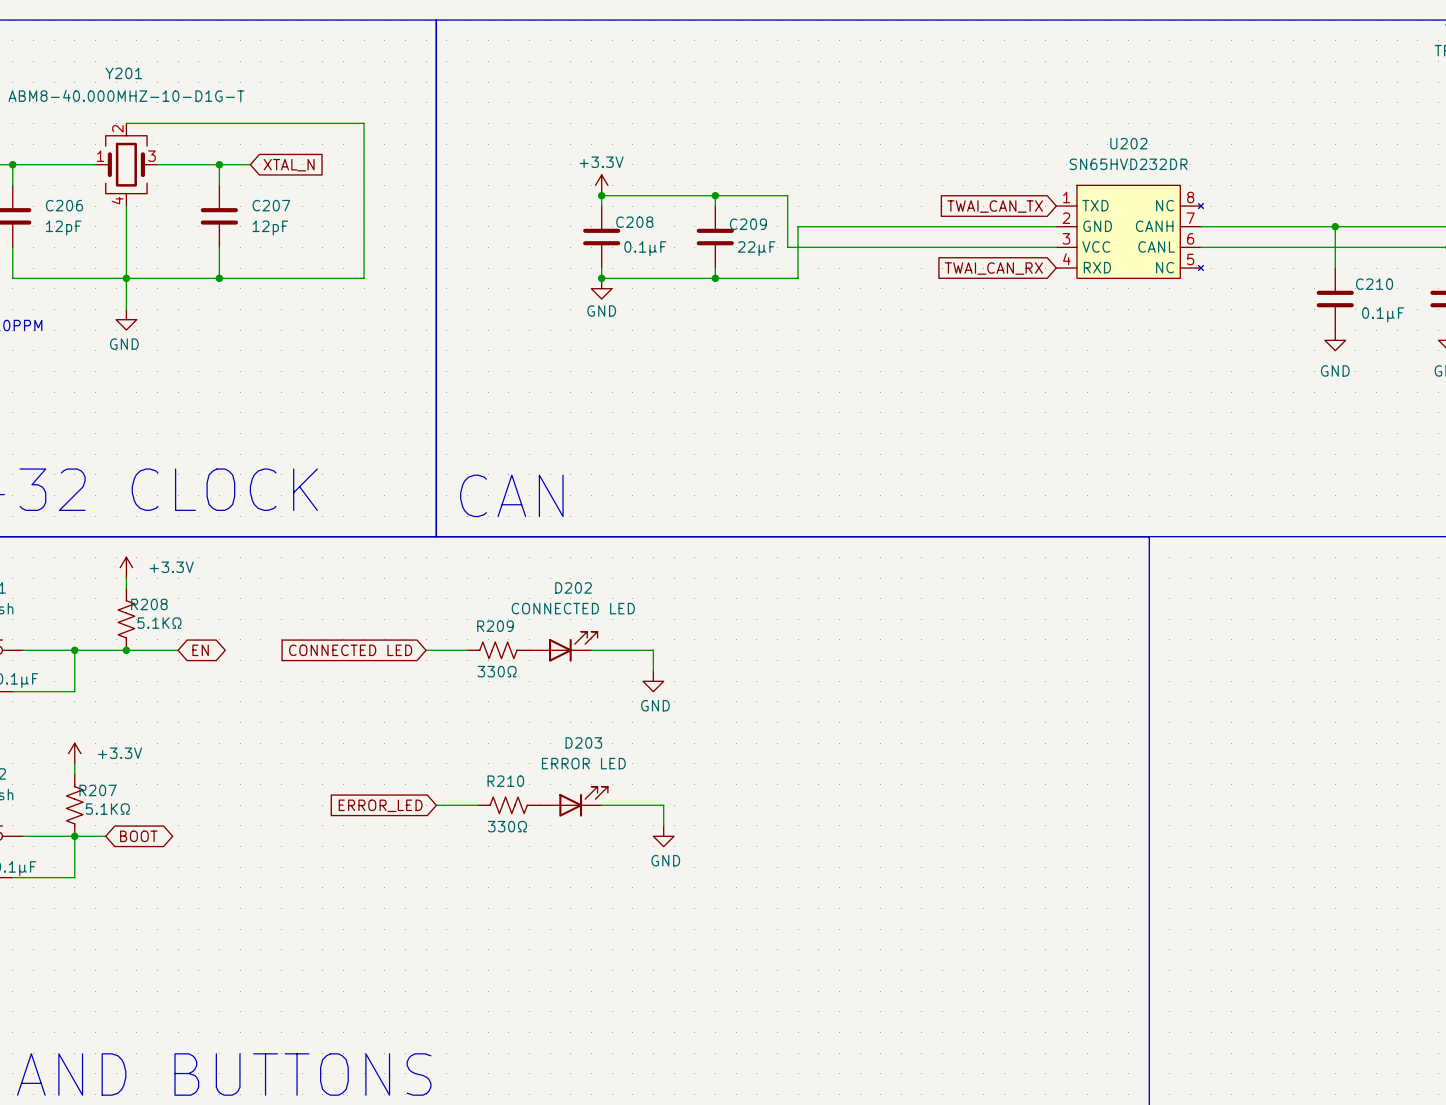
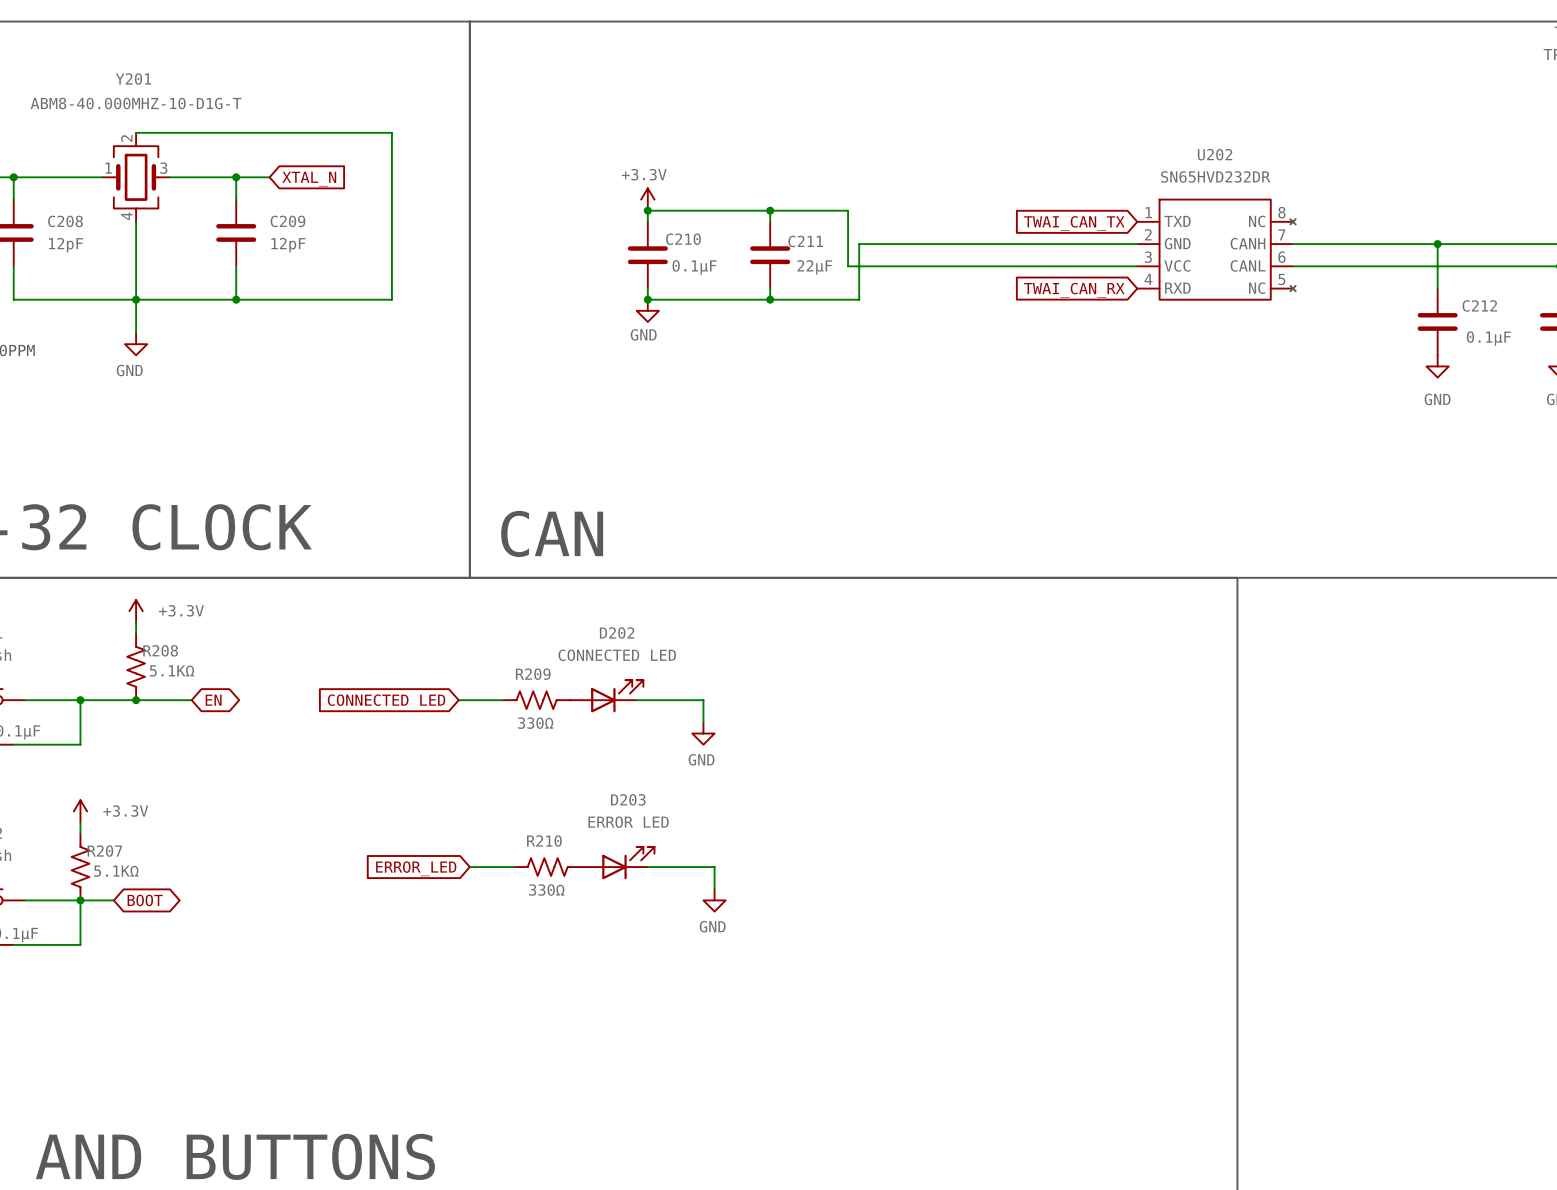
C206 name: C206 (64, 205) -> C208 (65, 221)
C207 name: C207 (271, 205) -> C209 (287, 221)
C208 name: C208 (634, 222) -> C210 (683, 239)
C209 name: C209 (748, 224) -> C211 (805, 241)
C210 name: C210 (1374, 284) -> C212 (1479, 305)

